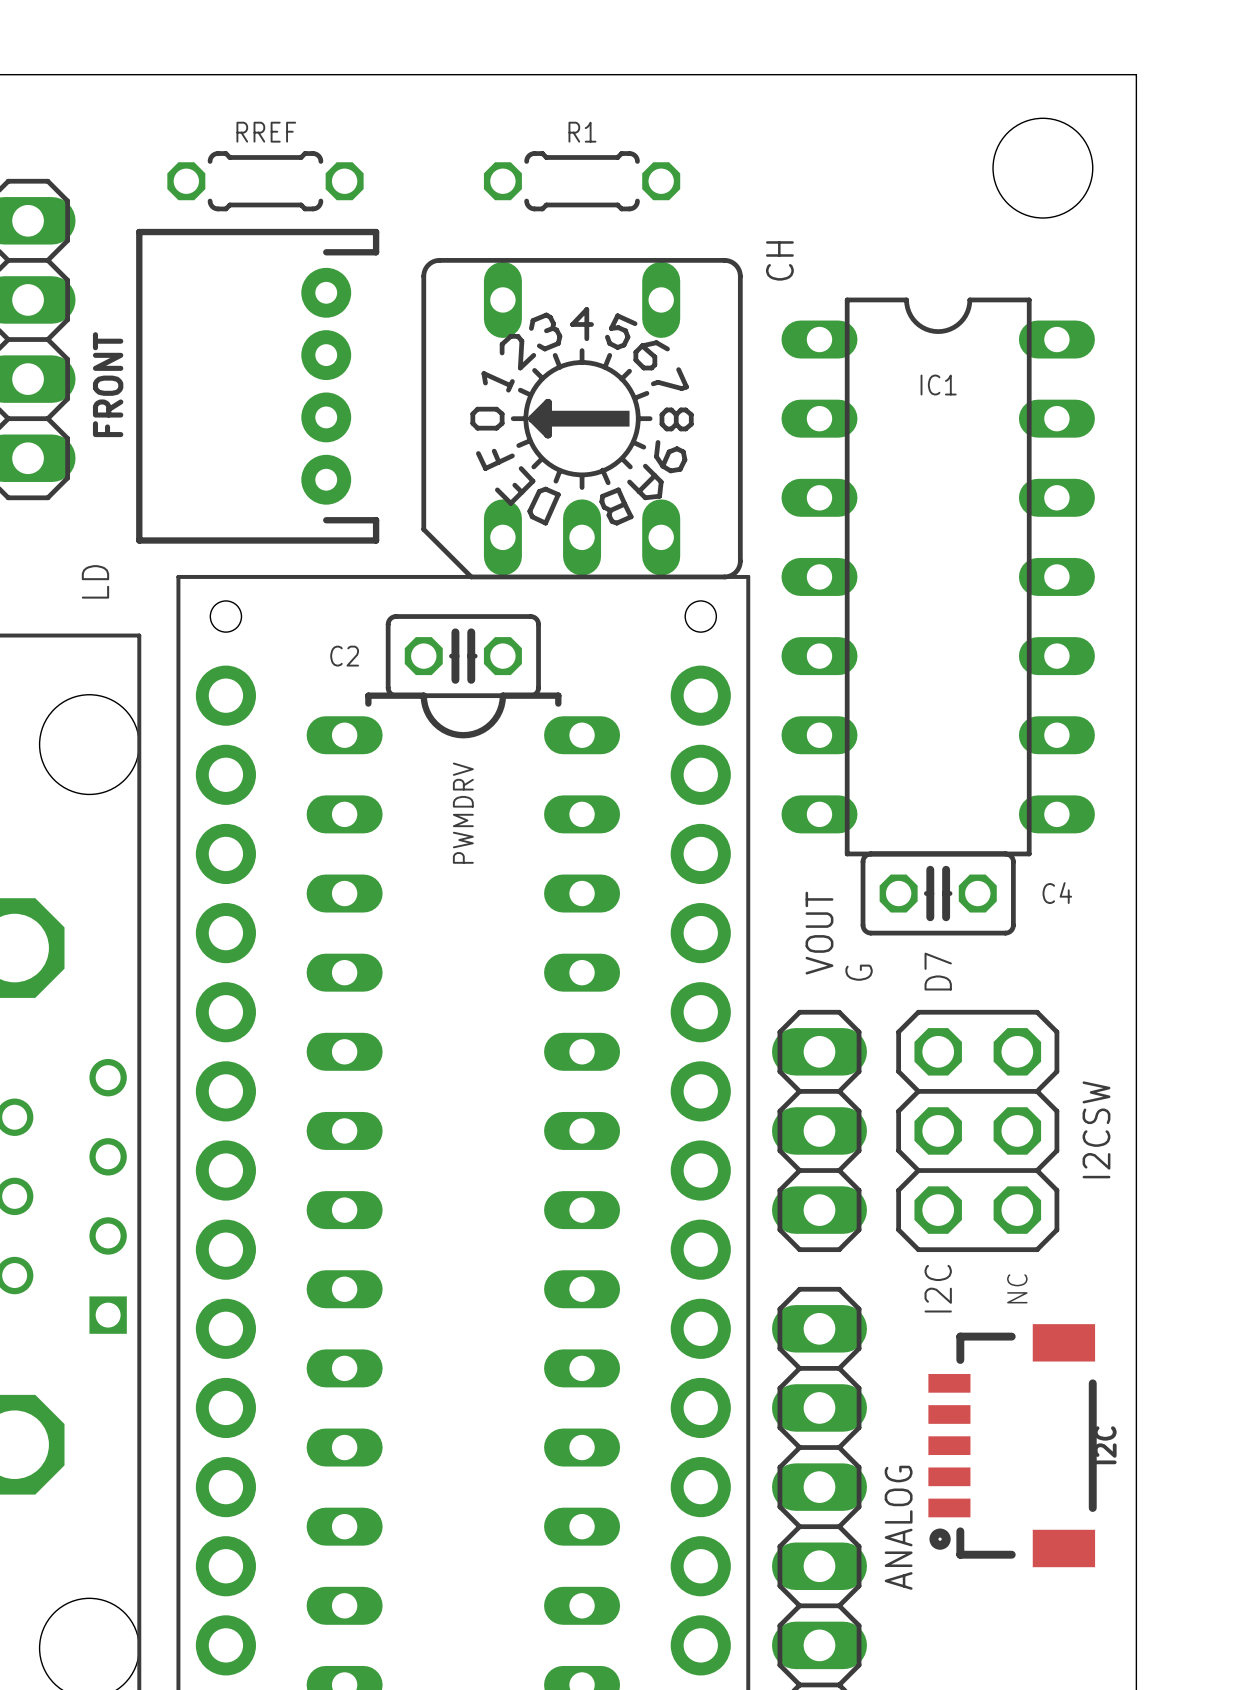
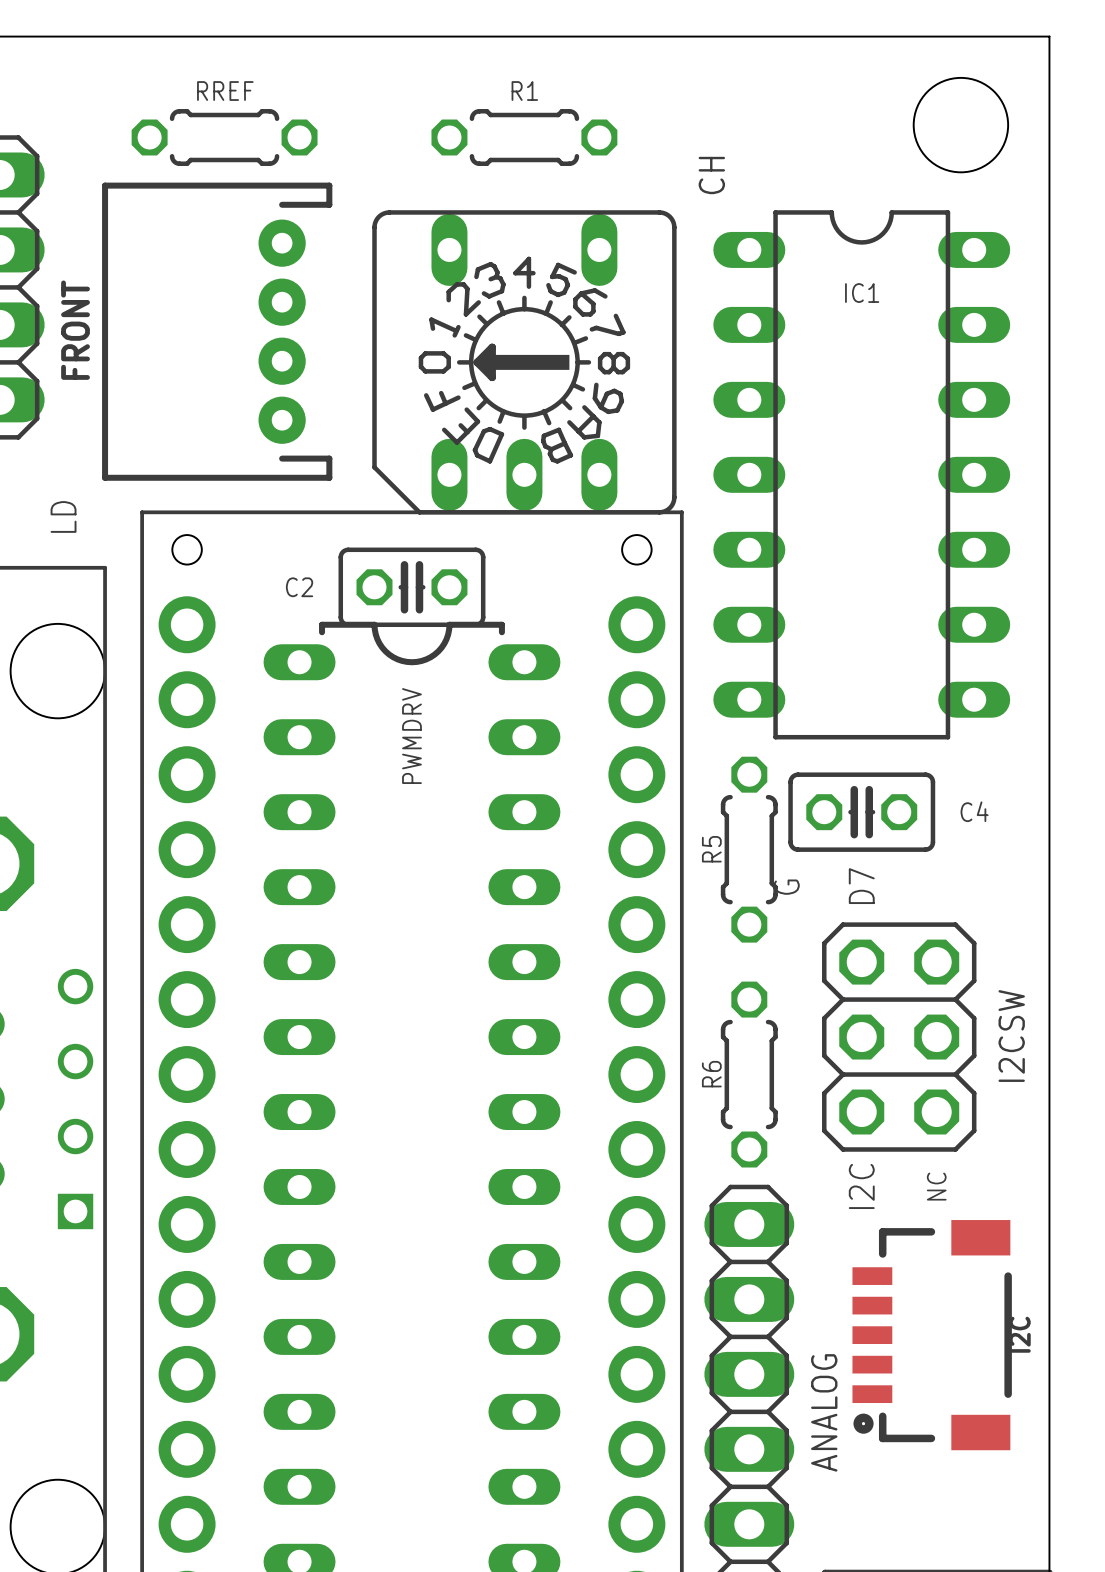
CH name position: CH (779, 260) -> CH (711, 175)
IC1 position: (938, 576) -> (861, 474)
R5: none -> (749, 849)
VOUT: (819, 1130) -> none
R6: none -> (749, 1074)

